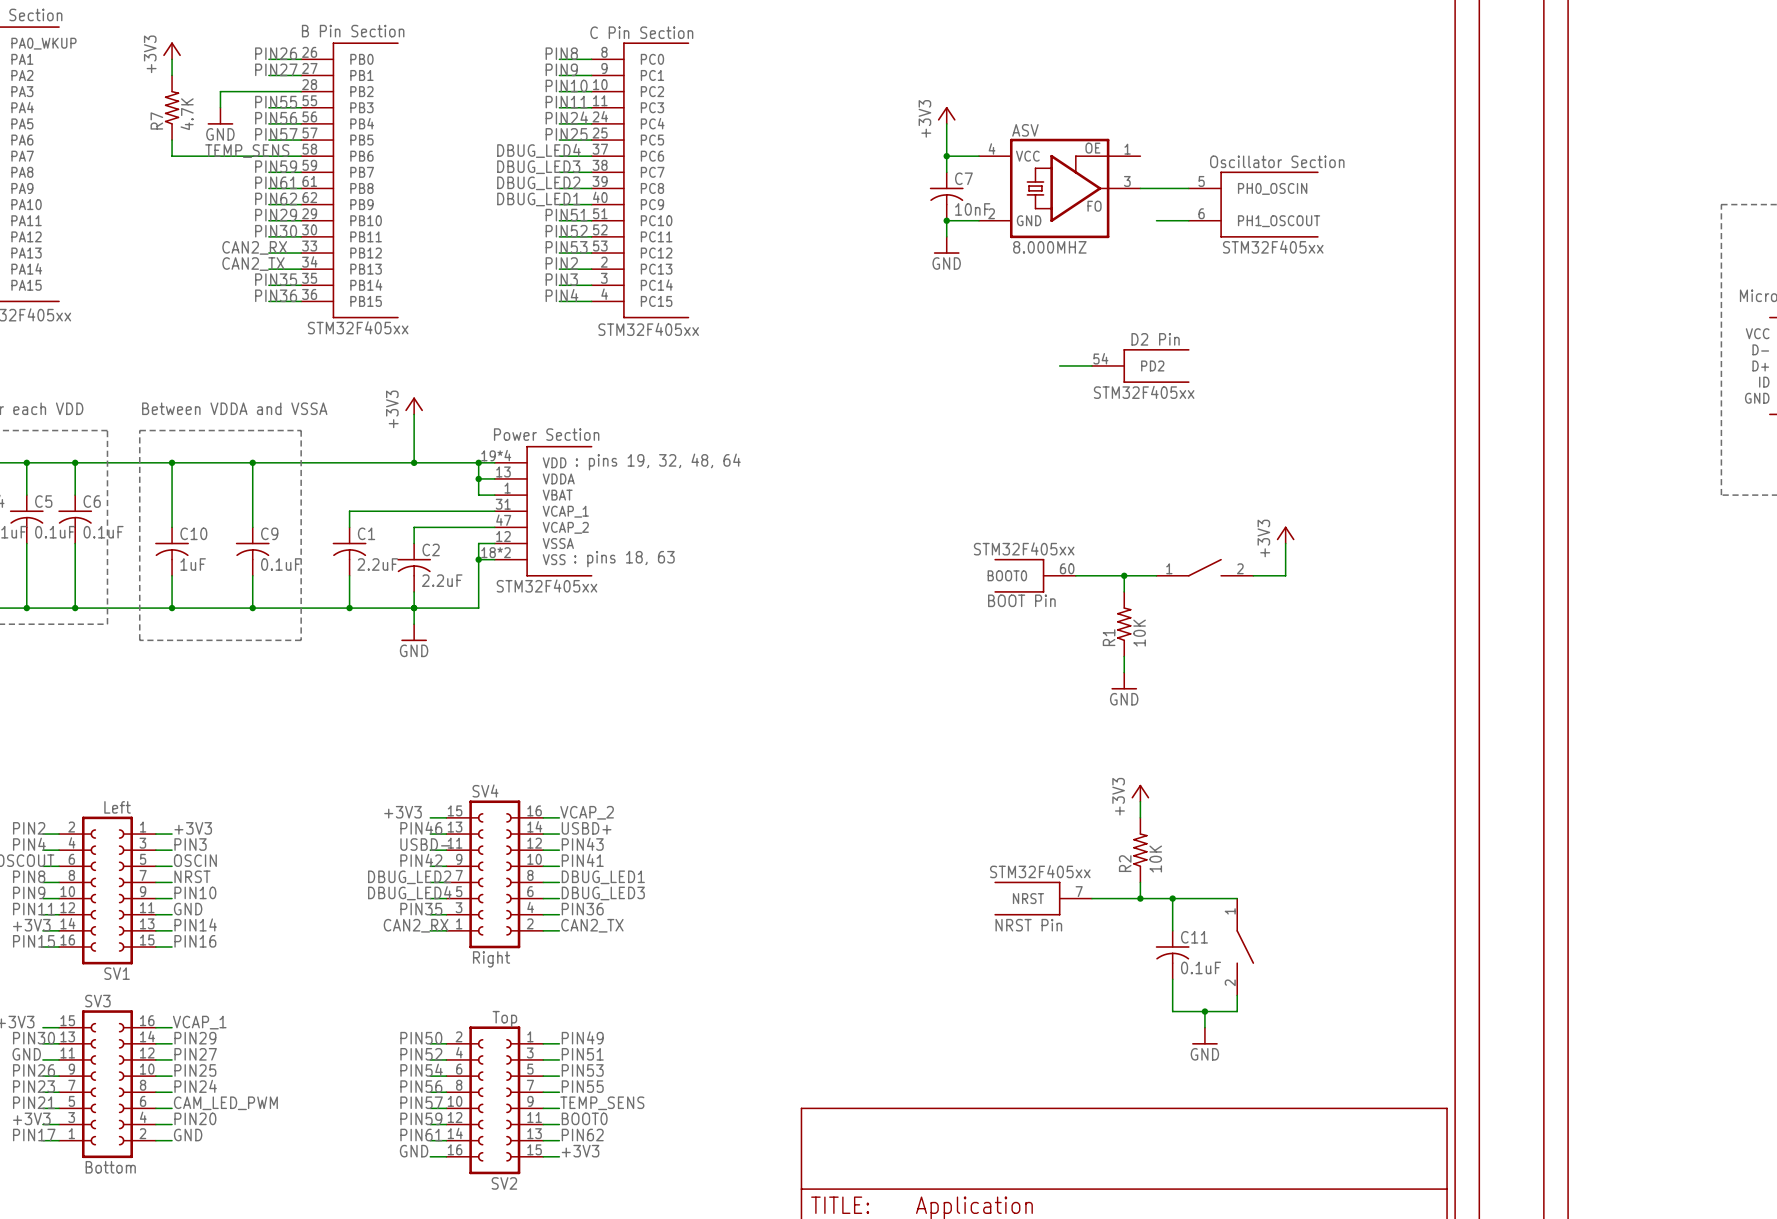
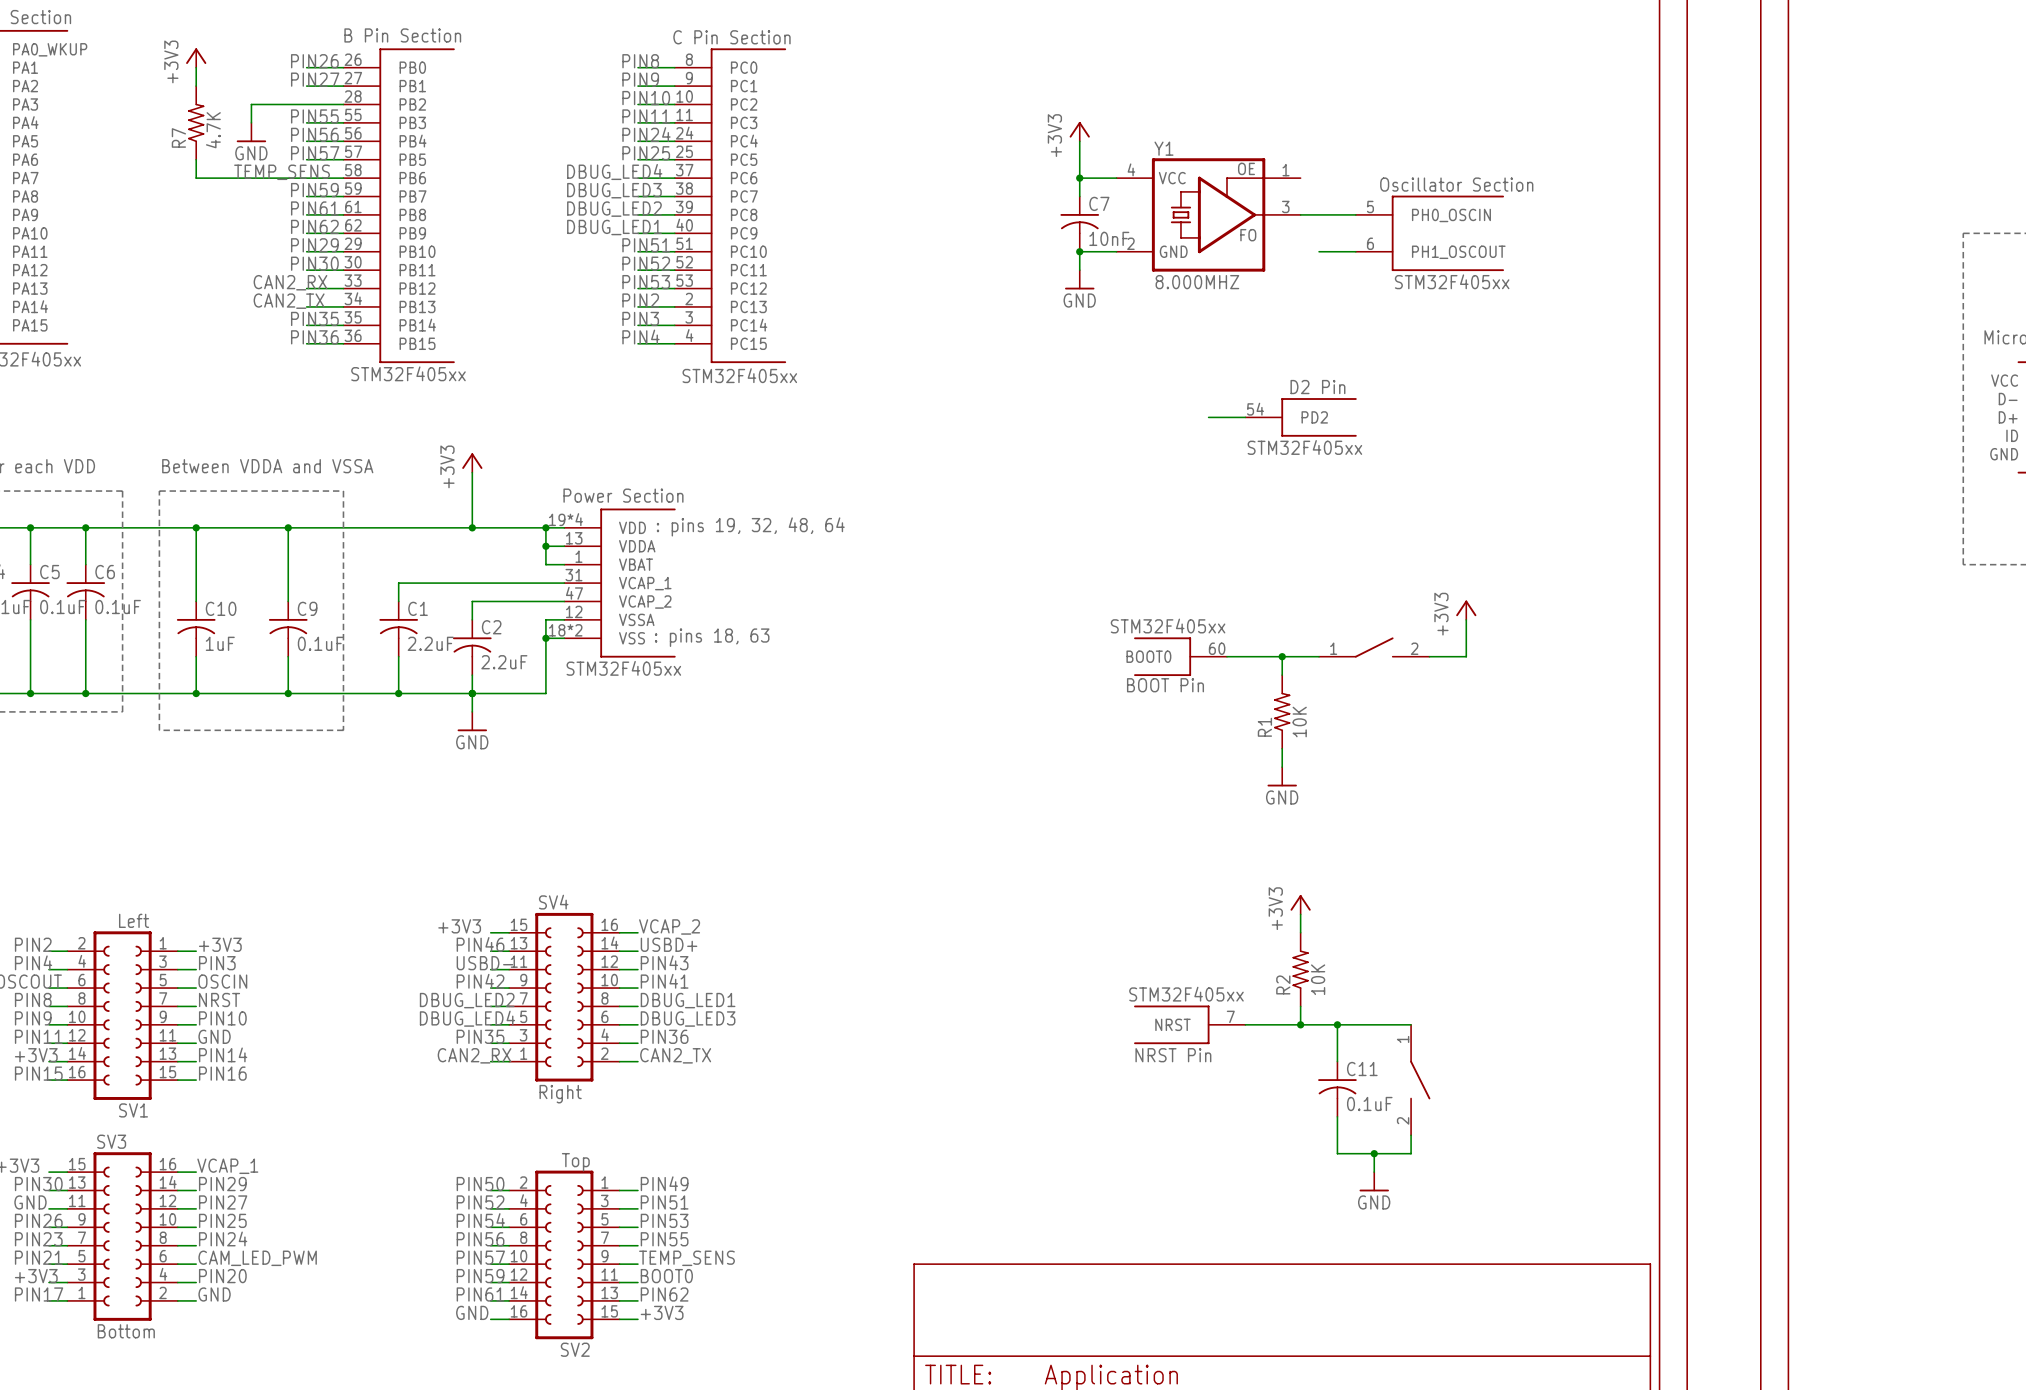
ASV name: ASV (1025, 130) -> Y1 (1163, 148)

